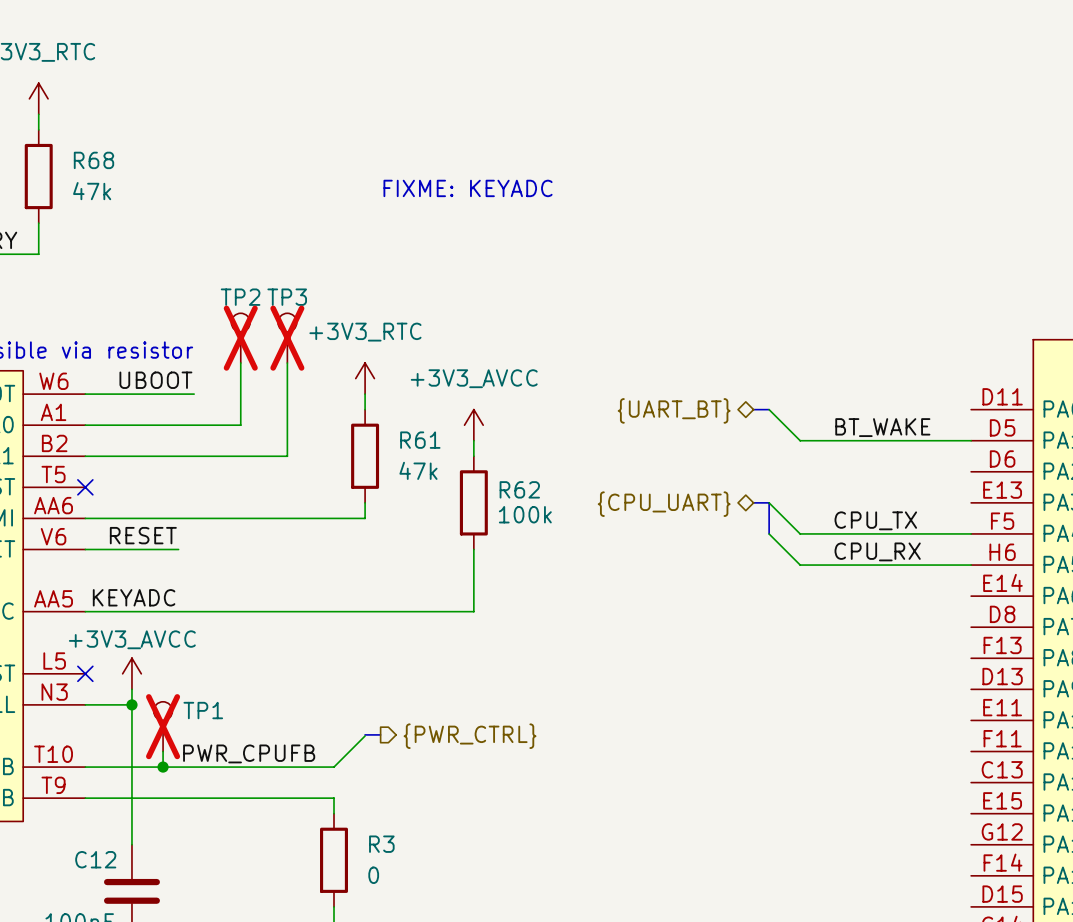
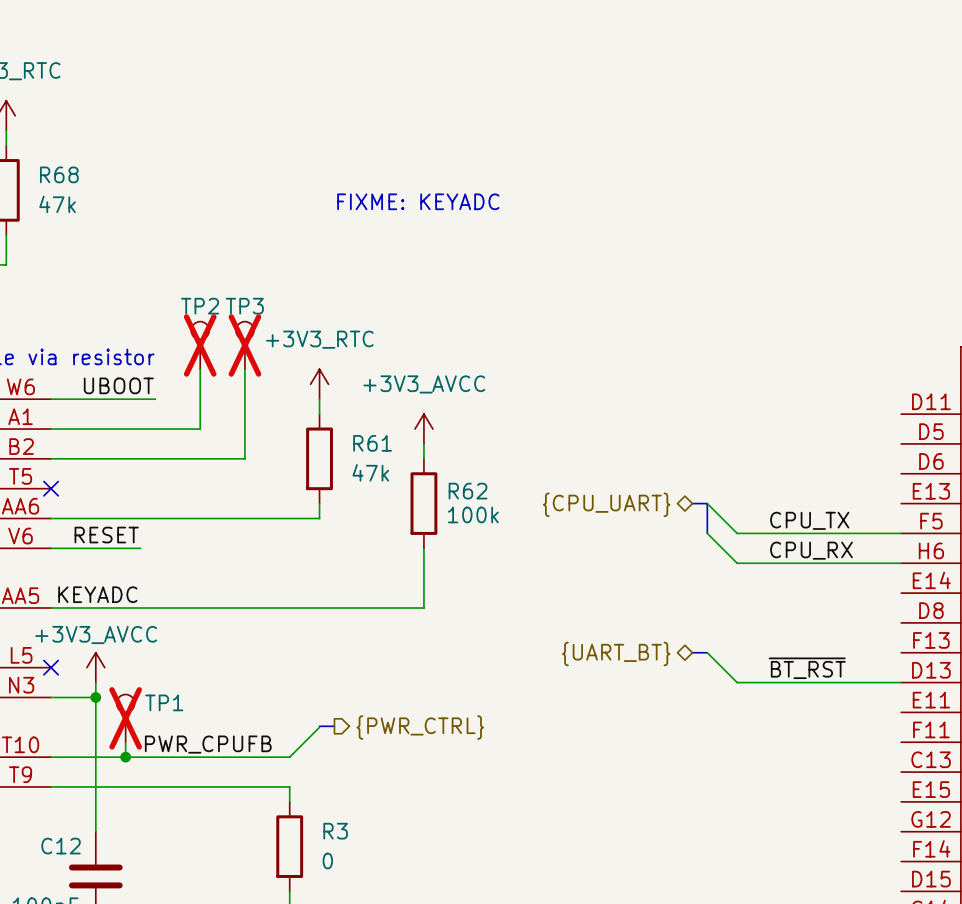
bus: (753, 409) (769, 409) -> (692, 652) (707, 652)
wire: (769, 409) (800, 440) (971, 440) -> (707, 652) (737, 682) (901, 682)
hierarchical label position: {UART_BT} (674, 410) -> {UART_BT} (616, 653)
label: BT_WAKE (882, 427) -> none
label: none -> ~{BT_RST} (807, 668)

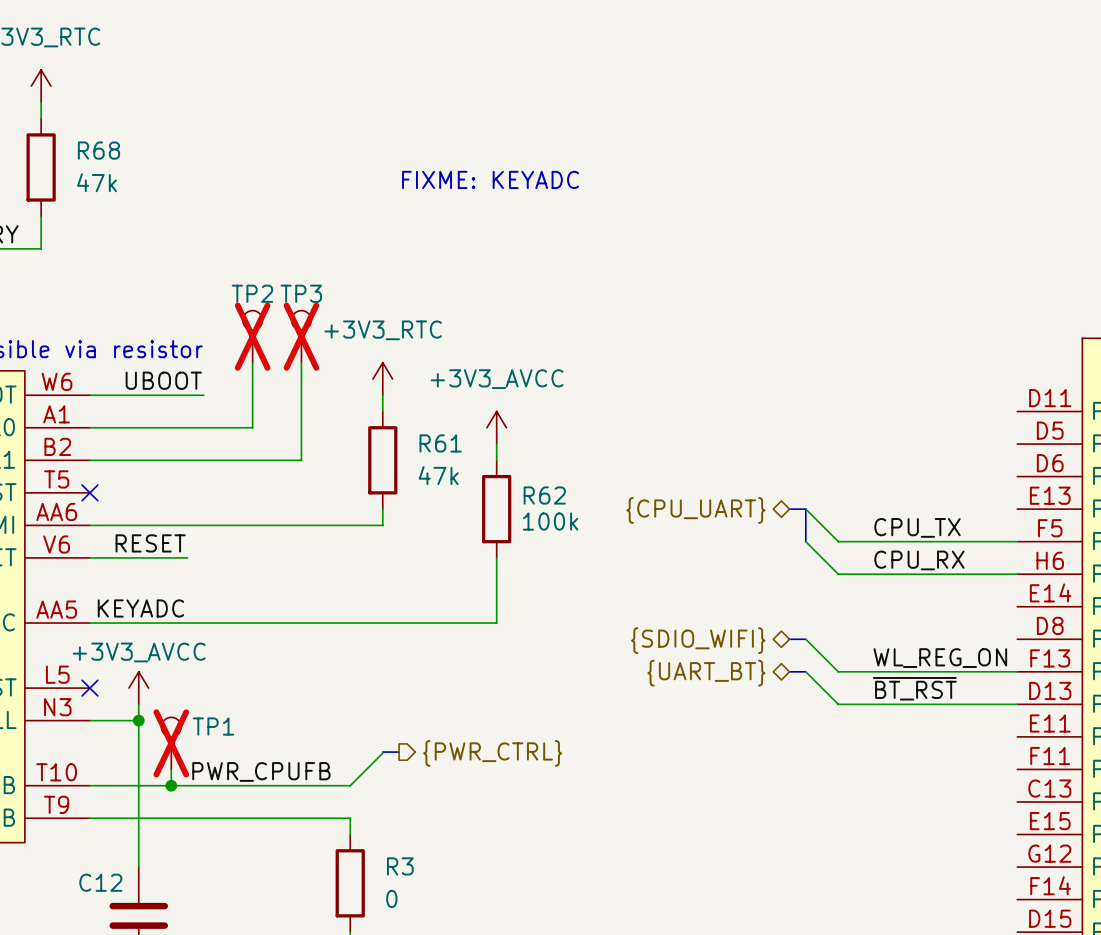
bus: none -> (789, 639) (805, 639)
wire: none -> (805, 639) (838, 671) (1017, 671)
hierarchical label: none -> {SDIO_WIFI} (698, 640)
label: none -> WL_REG_ON (940, 658)

